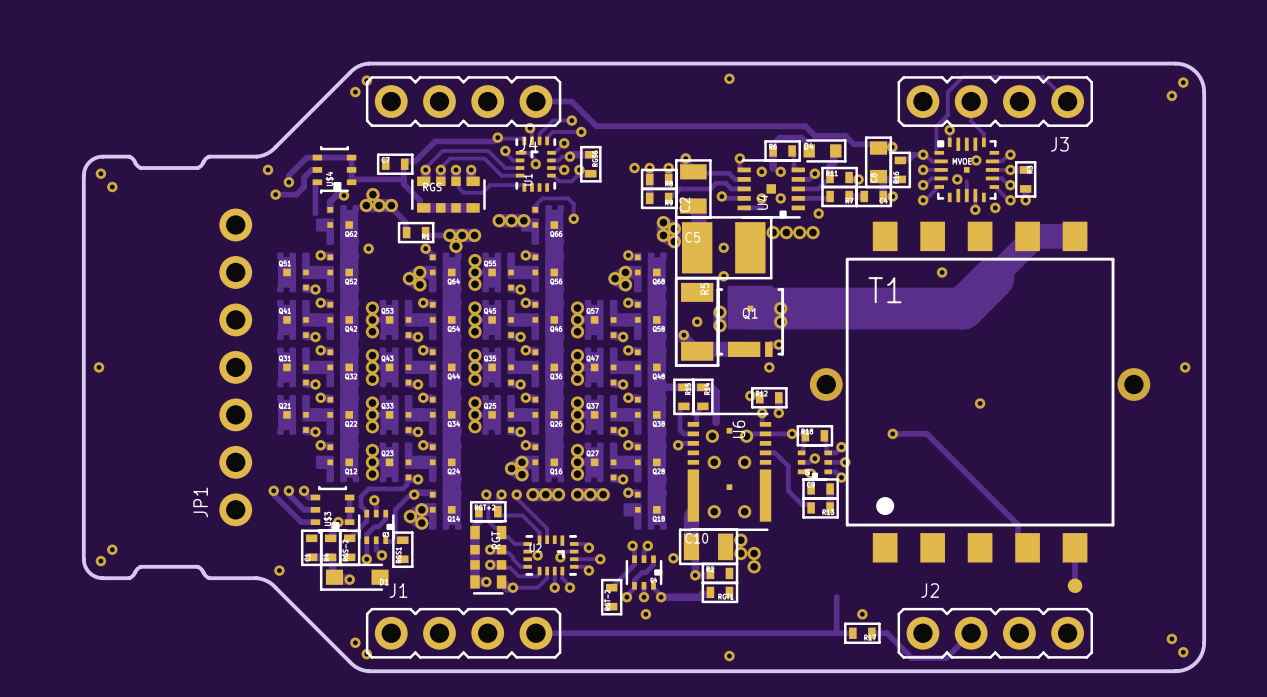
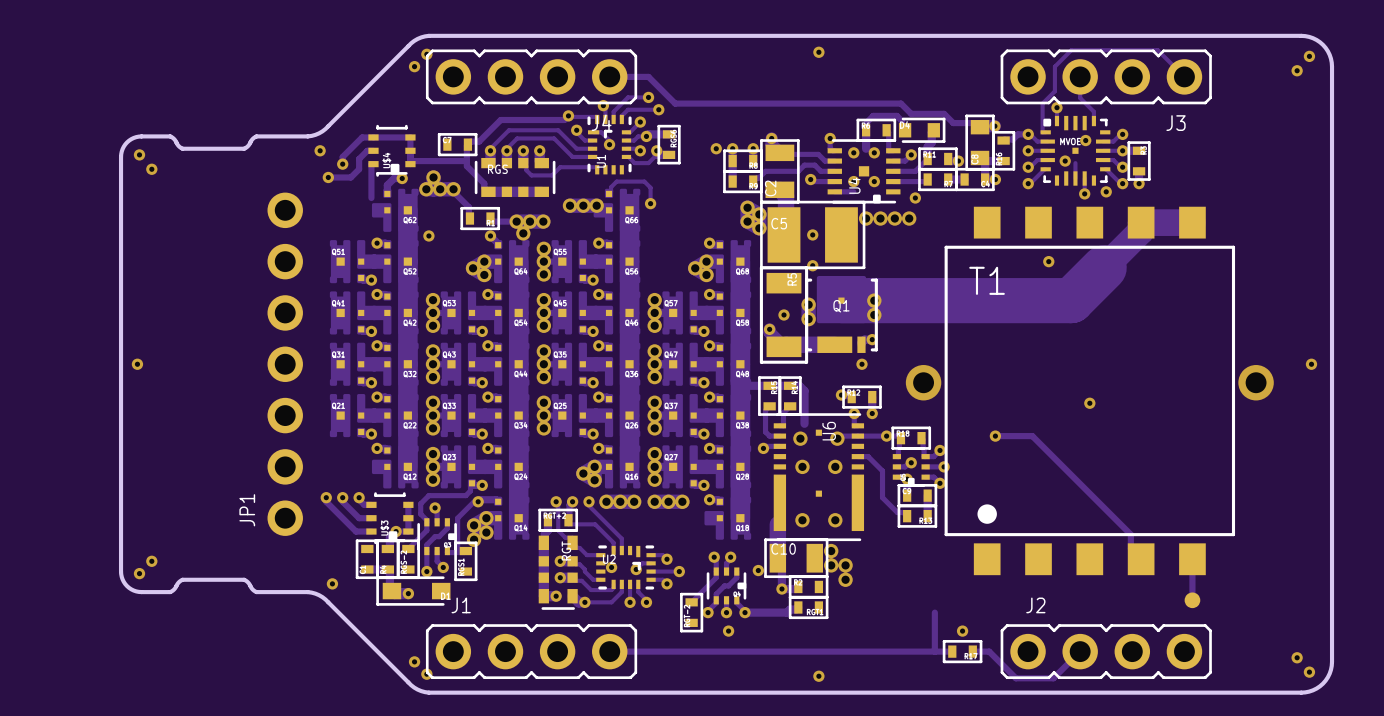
via: none -> (474, 539)

